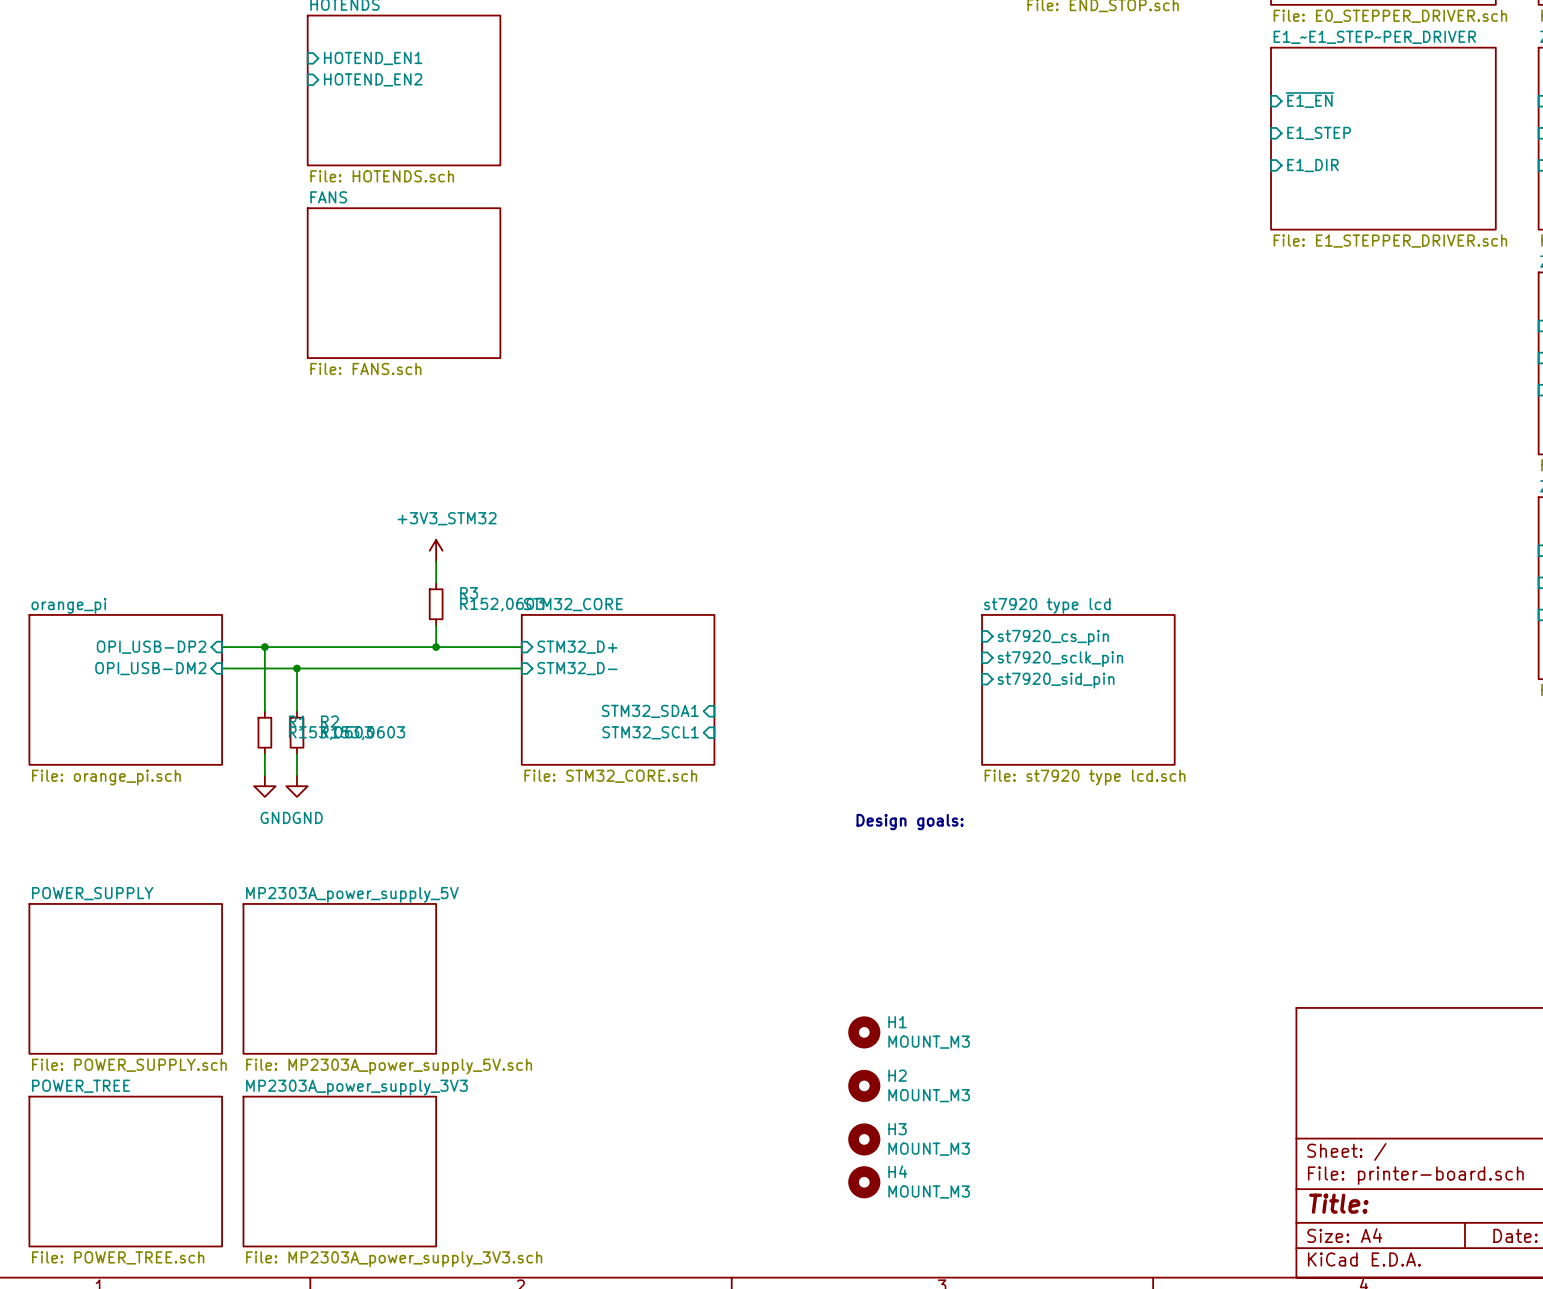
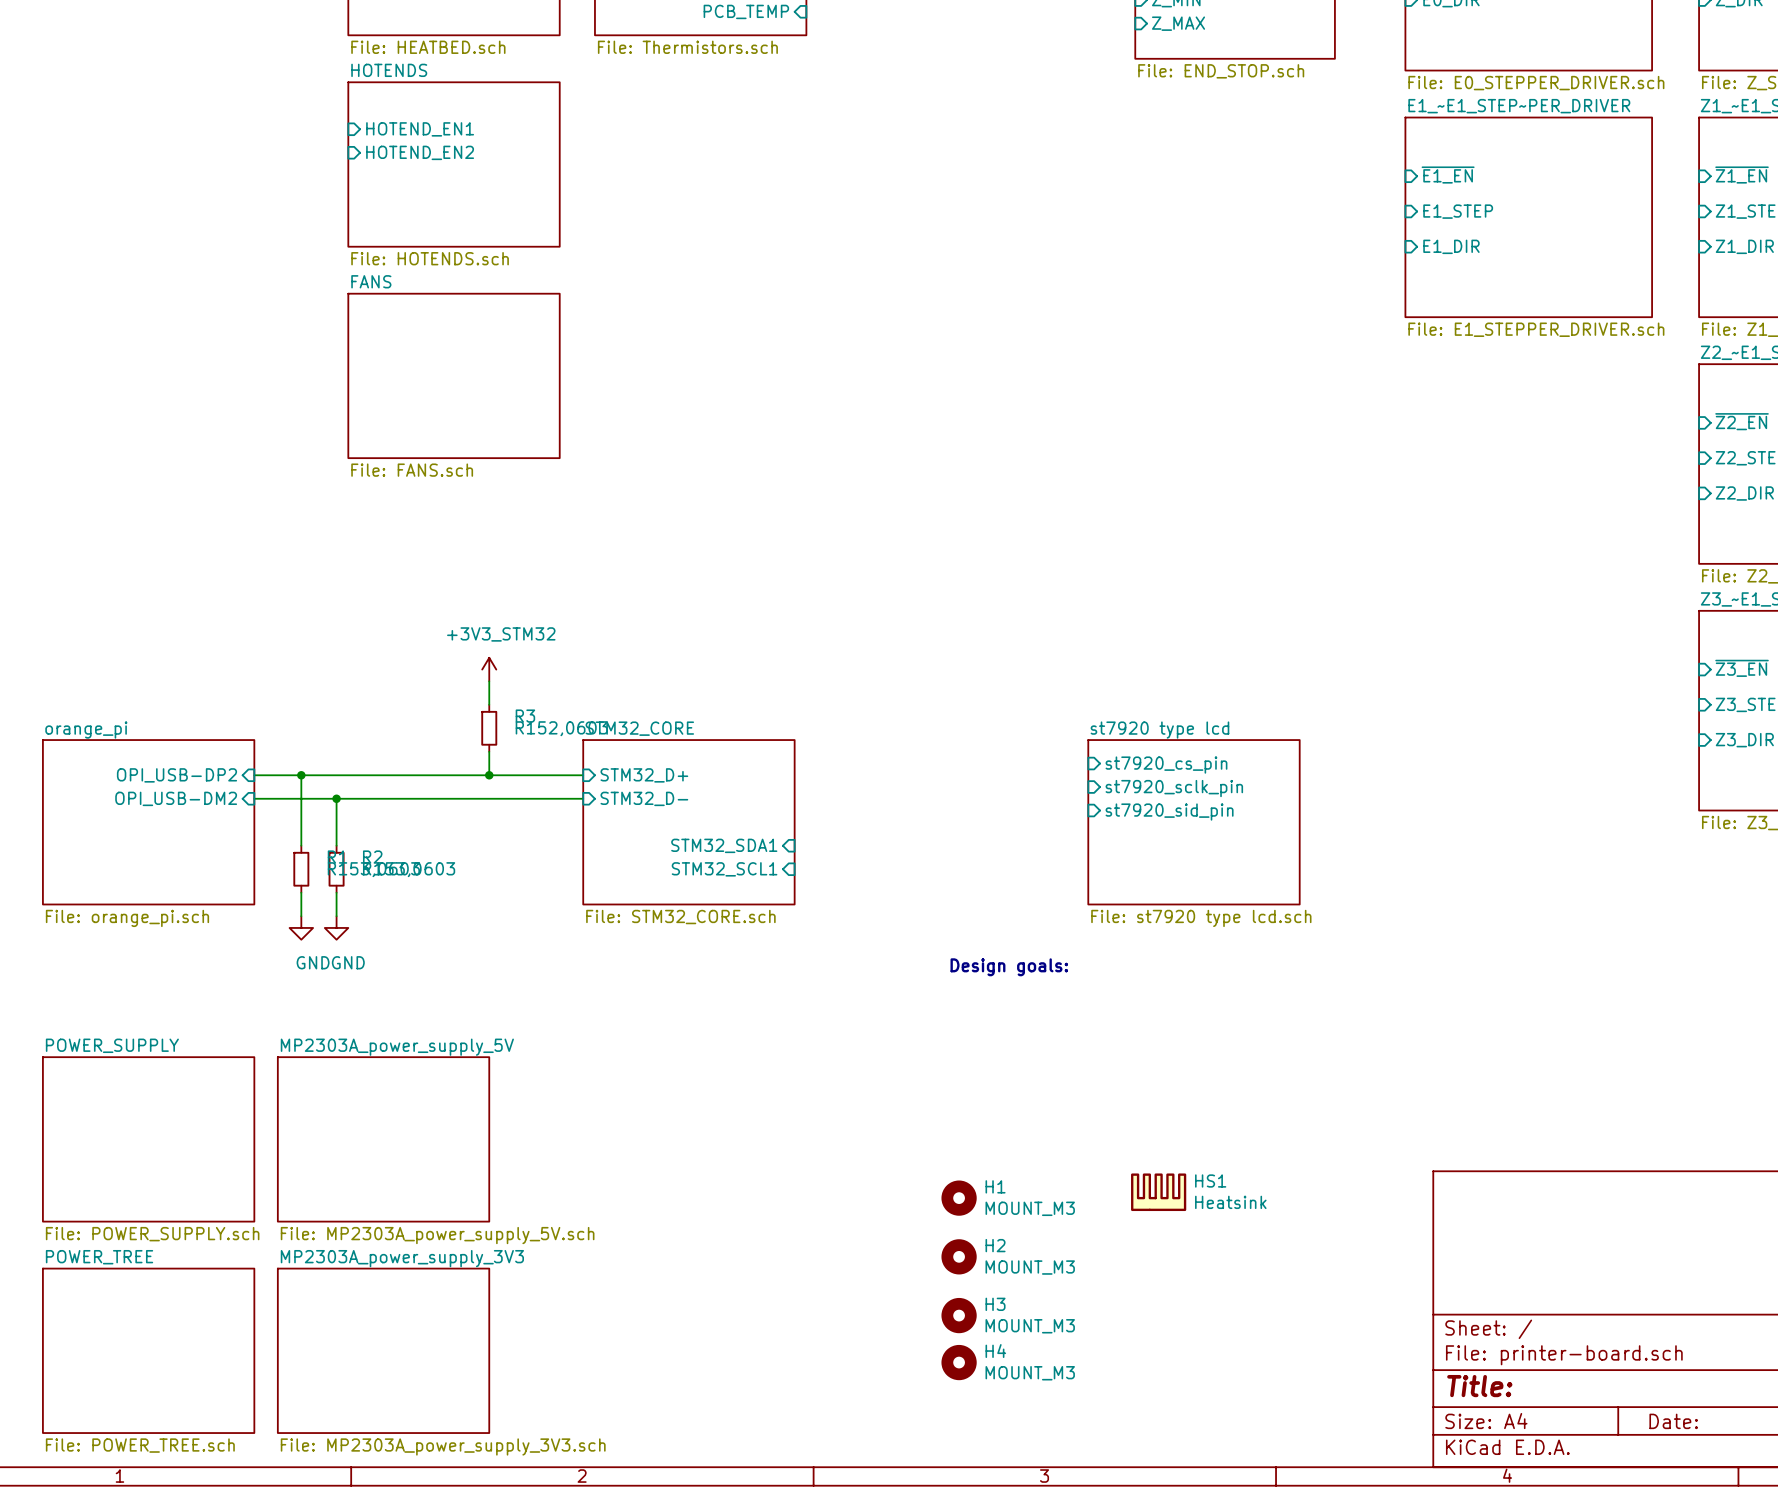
HS1: none -> Heatsink (1158, 1192)

